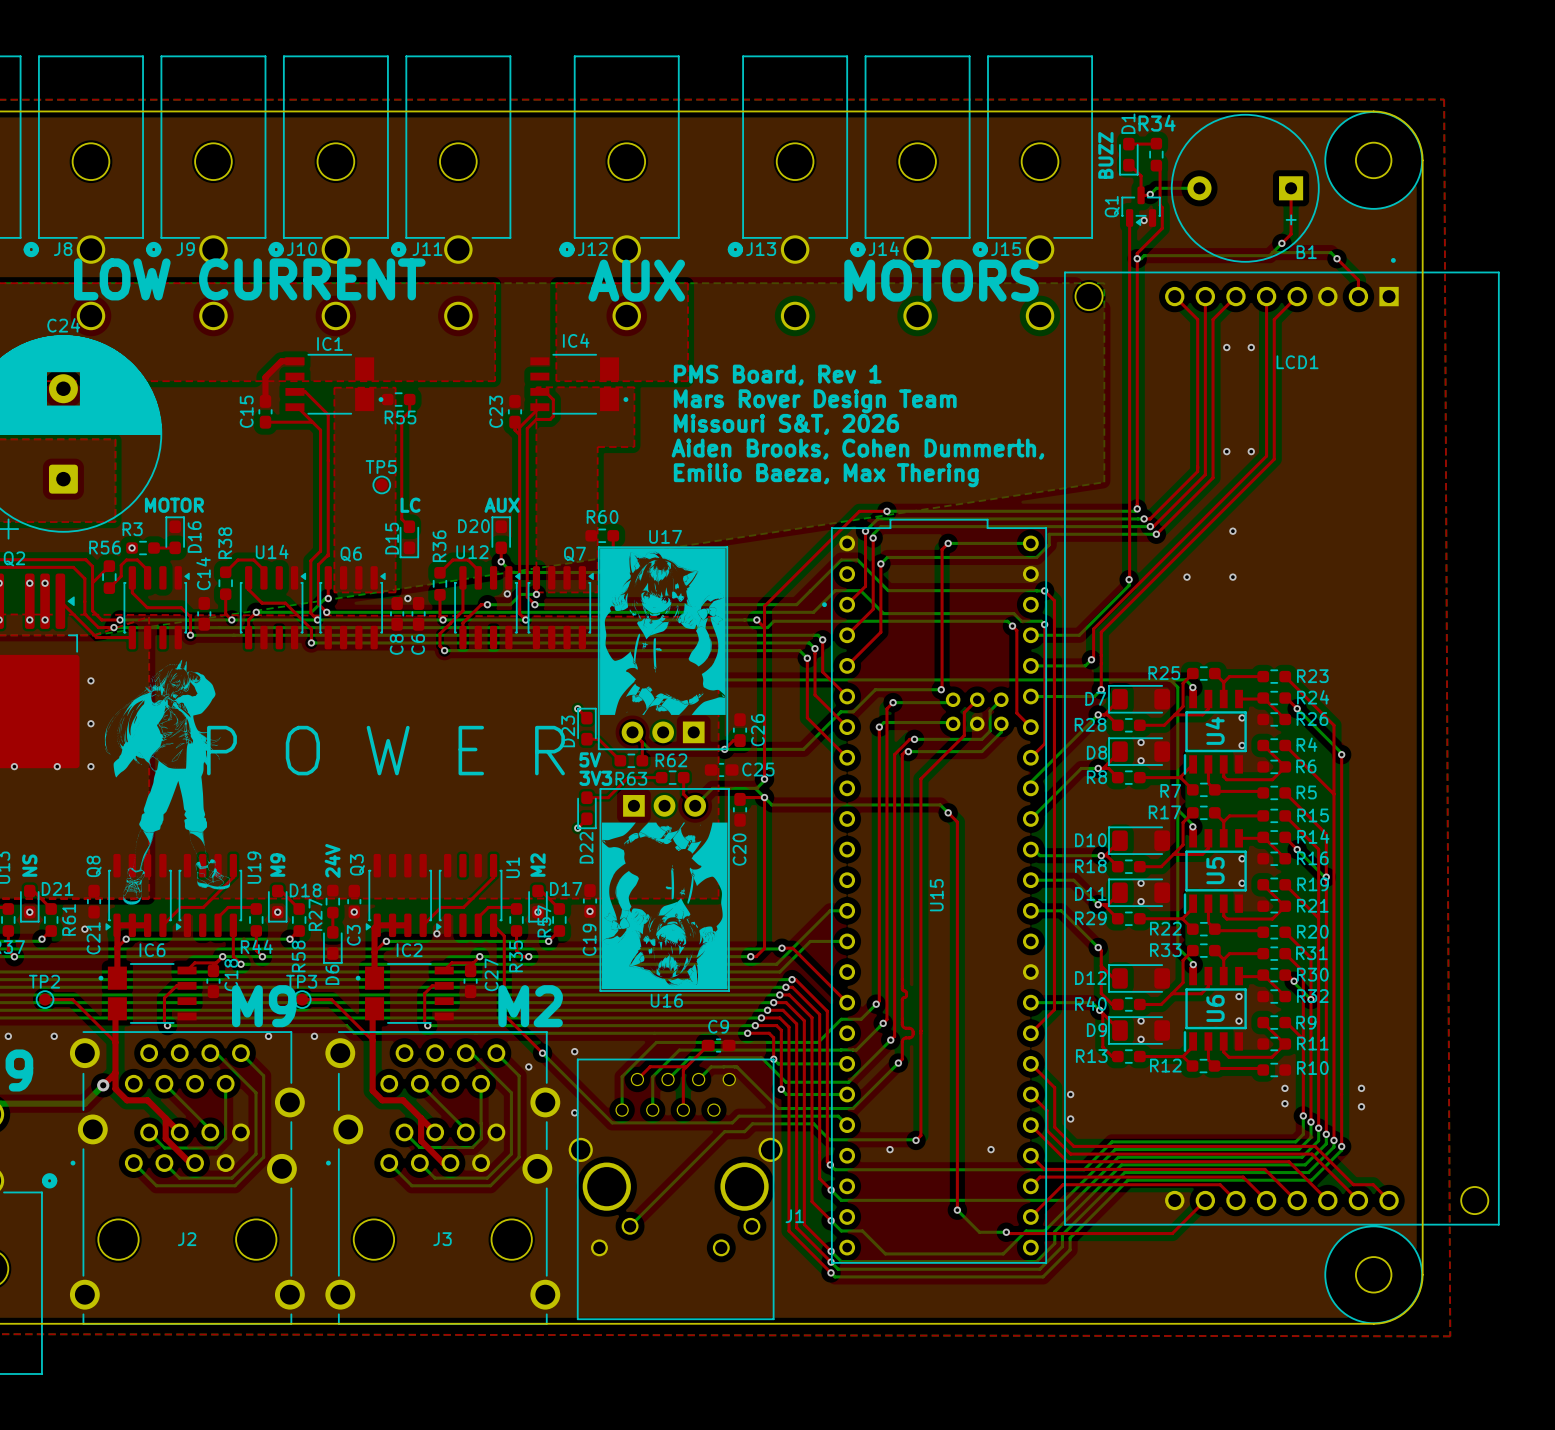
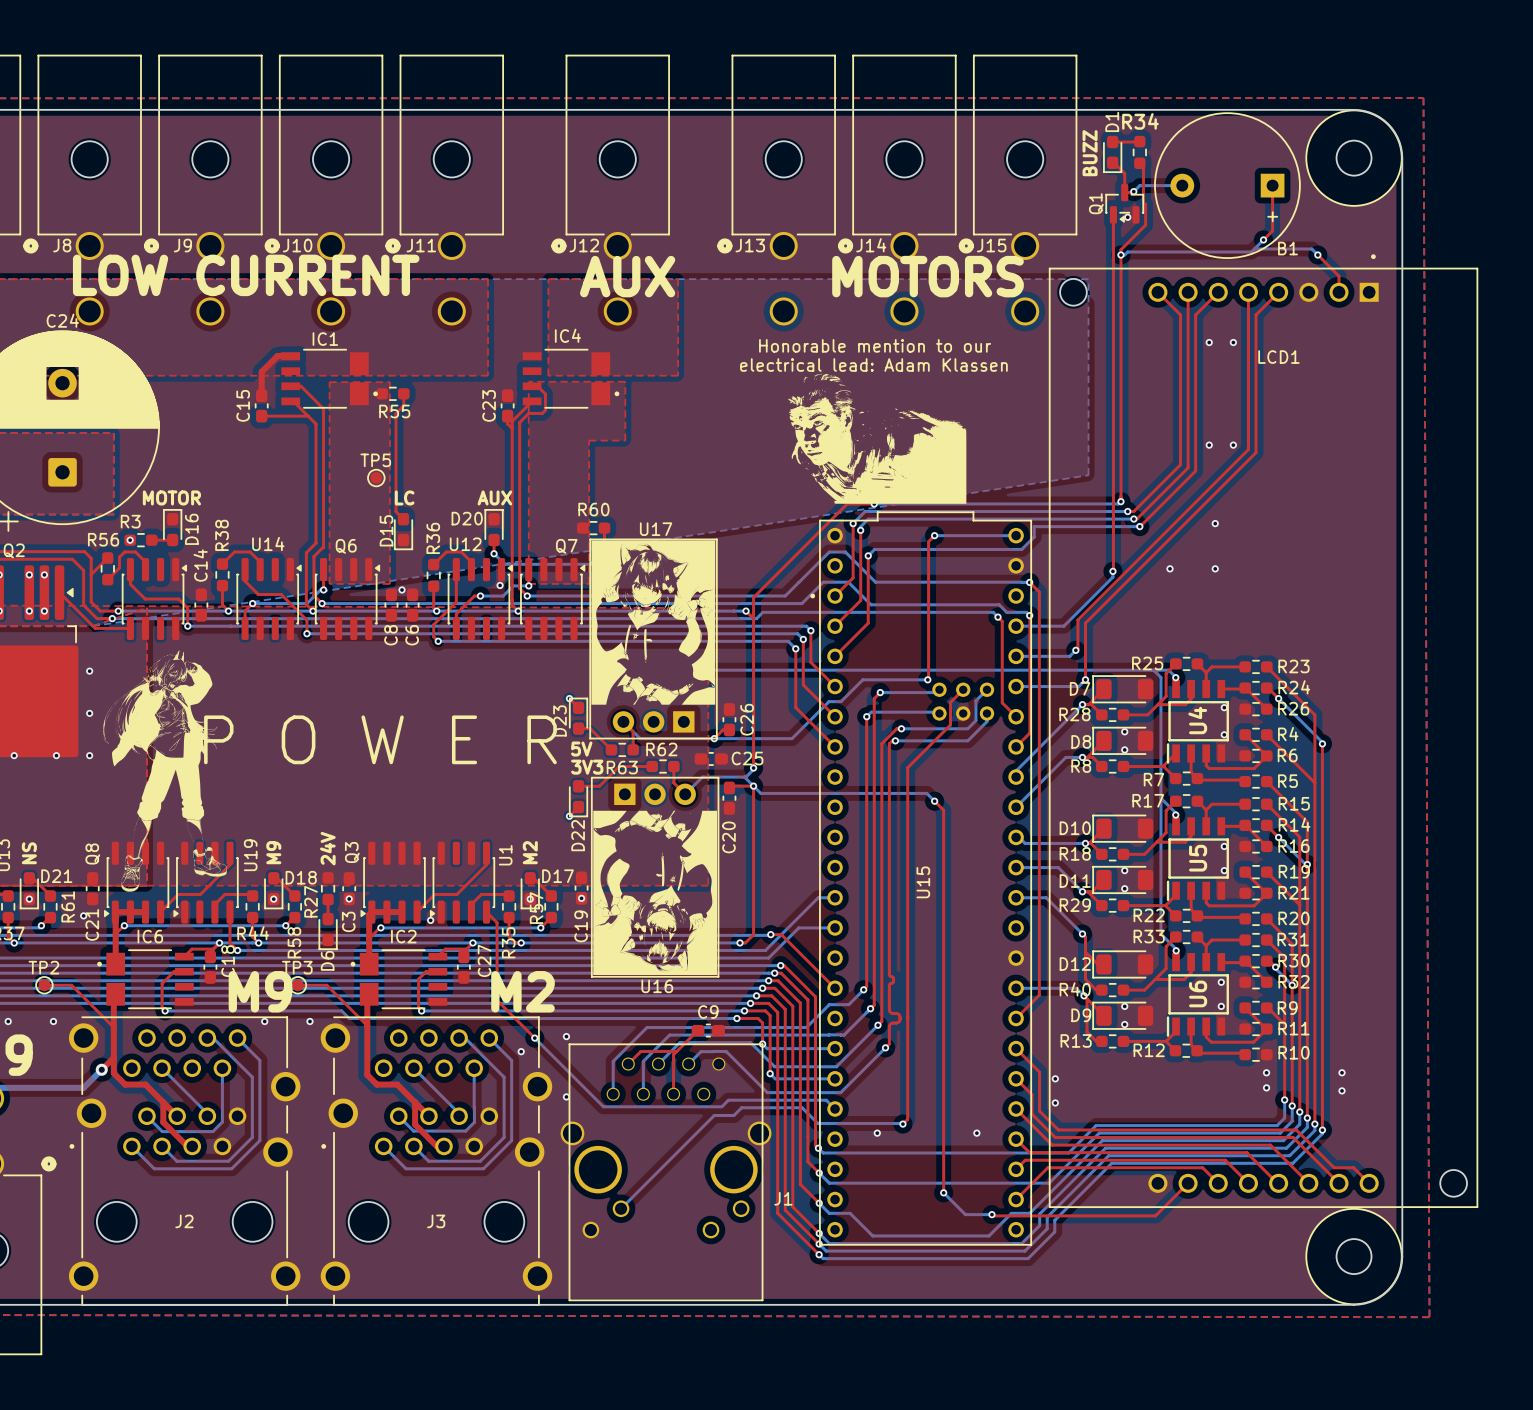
text: none -> Honorable mention to our (875, 345)
text: none -> electrical lead: Adam Klassen (873, 365)
text: PMS Board, Rev 1 (777, 375) -> none
drawing: none -> [788, 373, 967, 504]
text: Mars Rover Design Team (815, 401) -> none
text: Missouri S&T, 2026 (786, 424) -> none
text: Aiden Brooks, Cohen Dummerth, (857, 449) -> none
text: Emilio Baeza, Max Thering (826, 475) -> none

